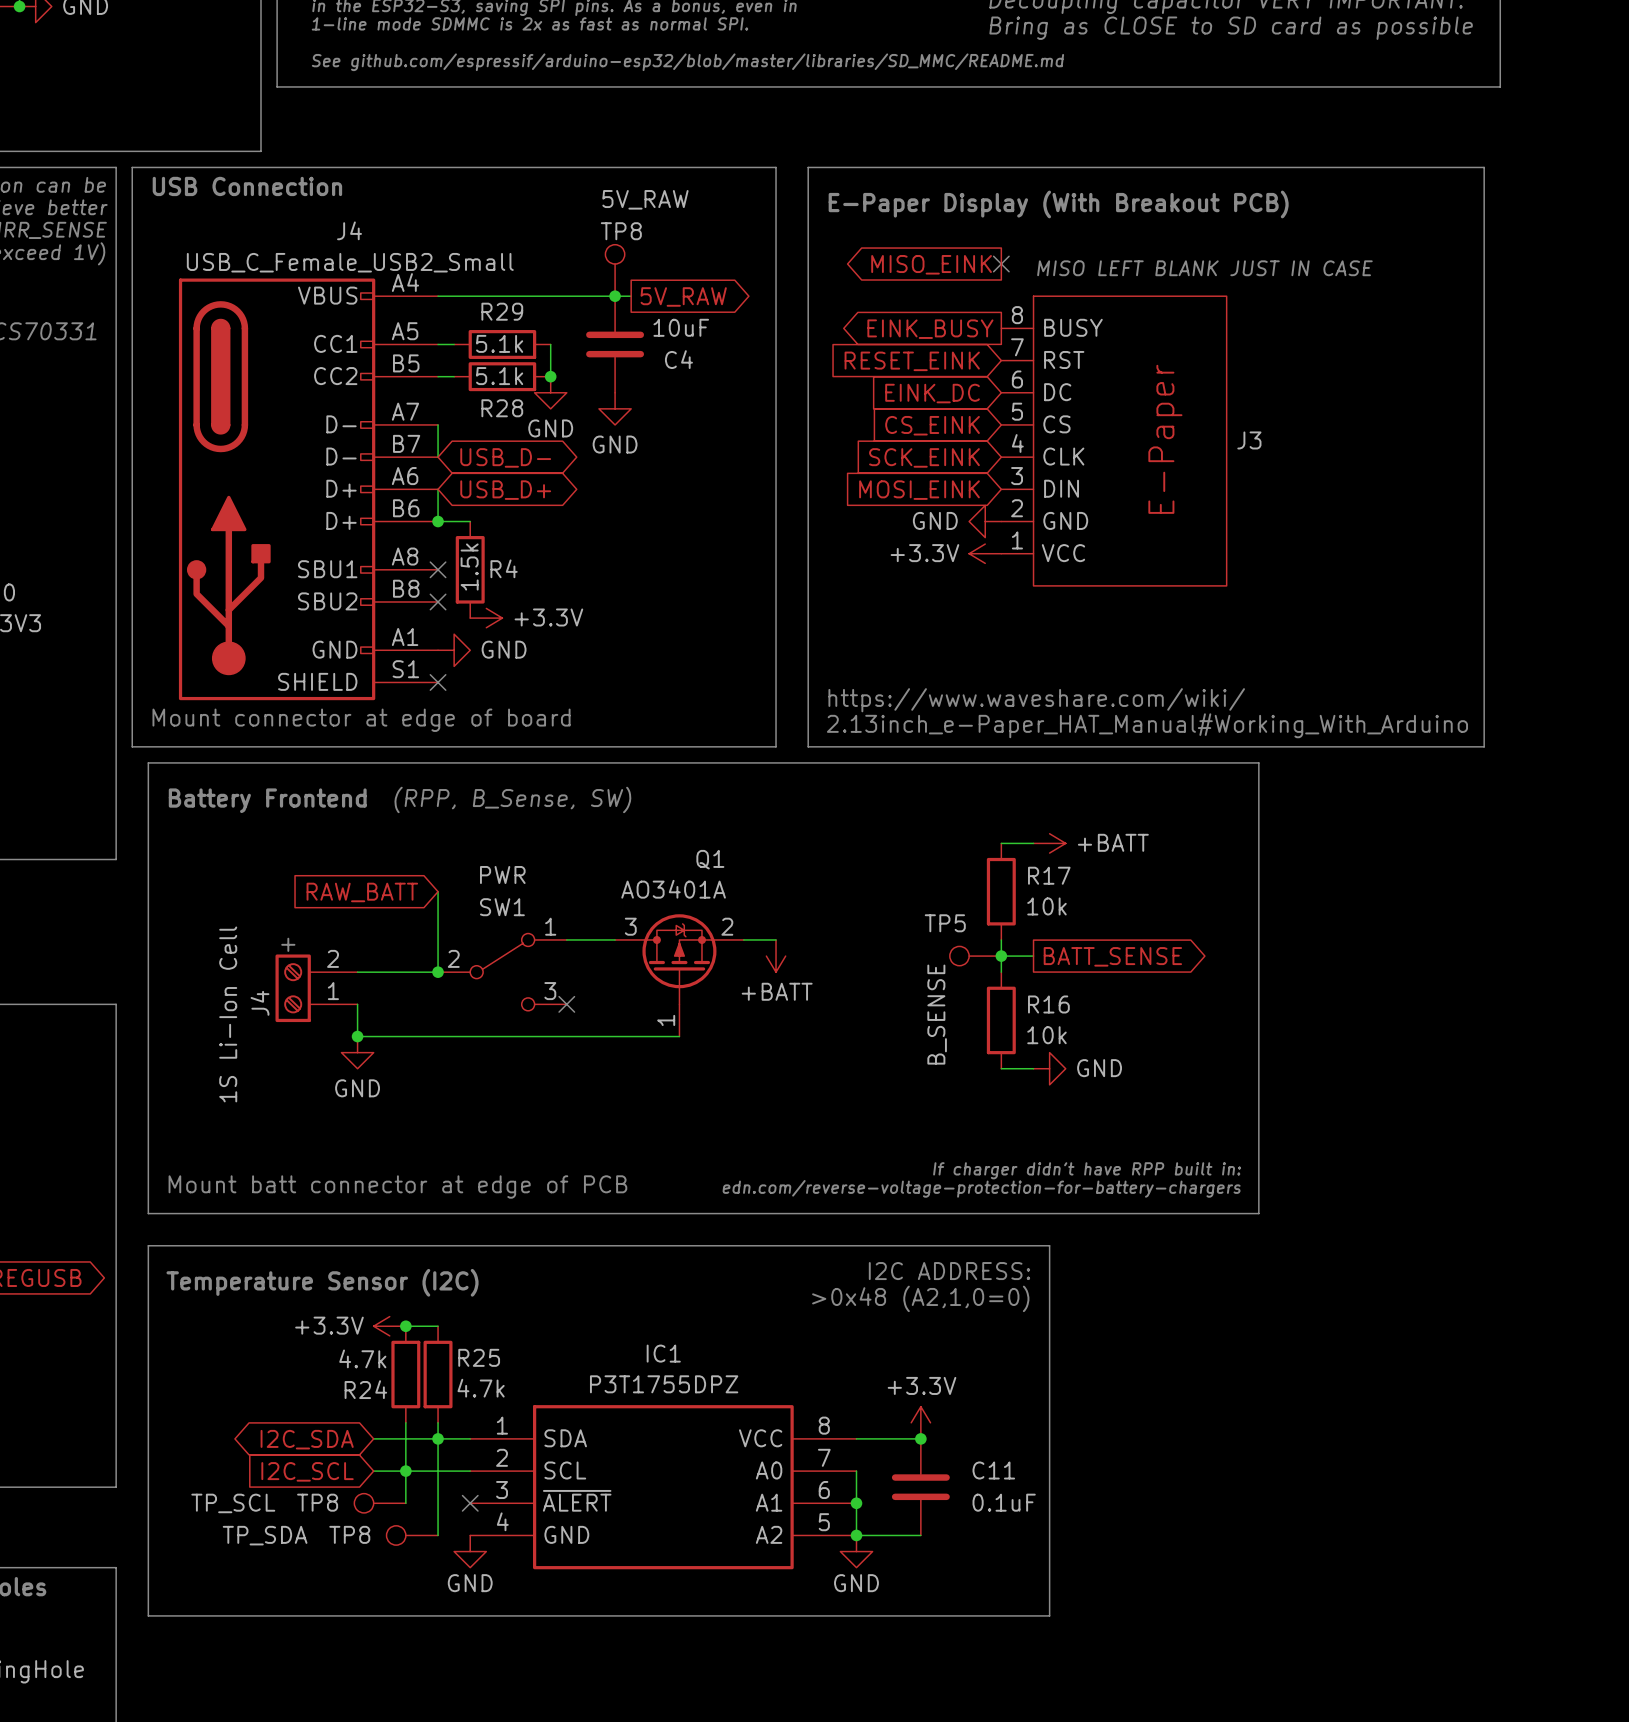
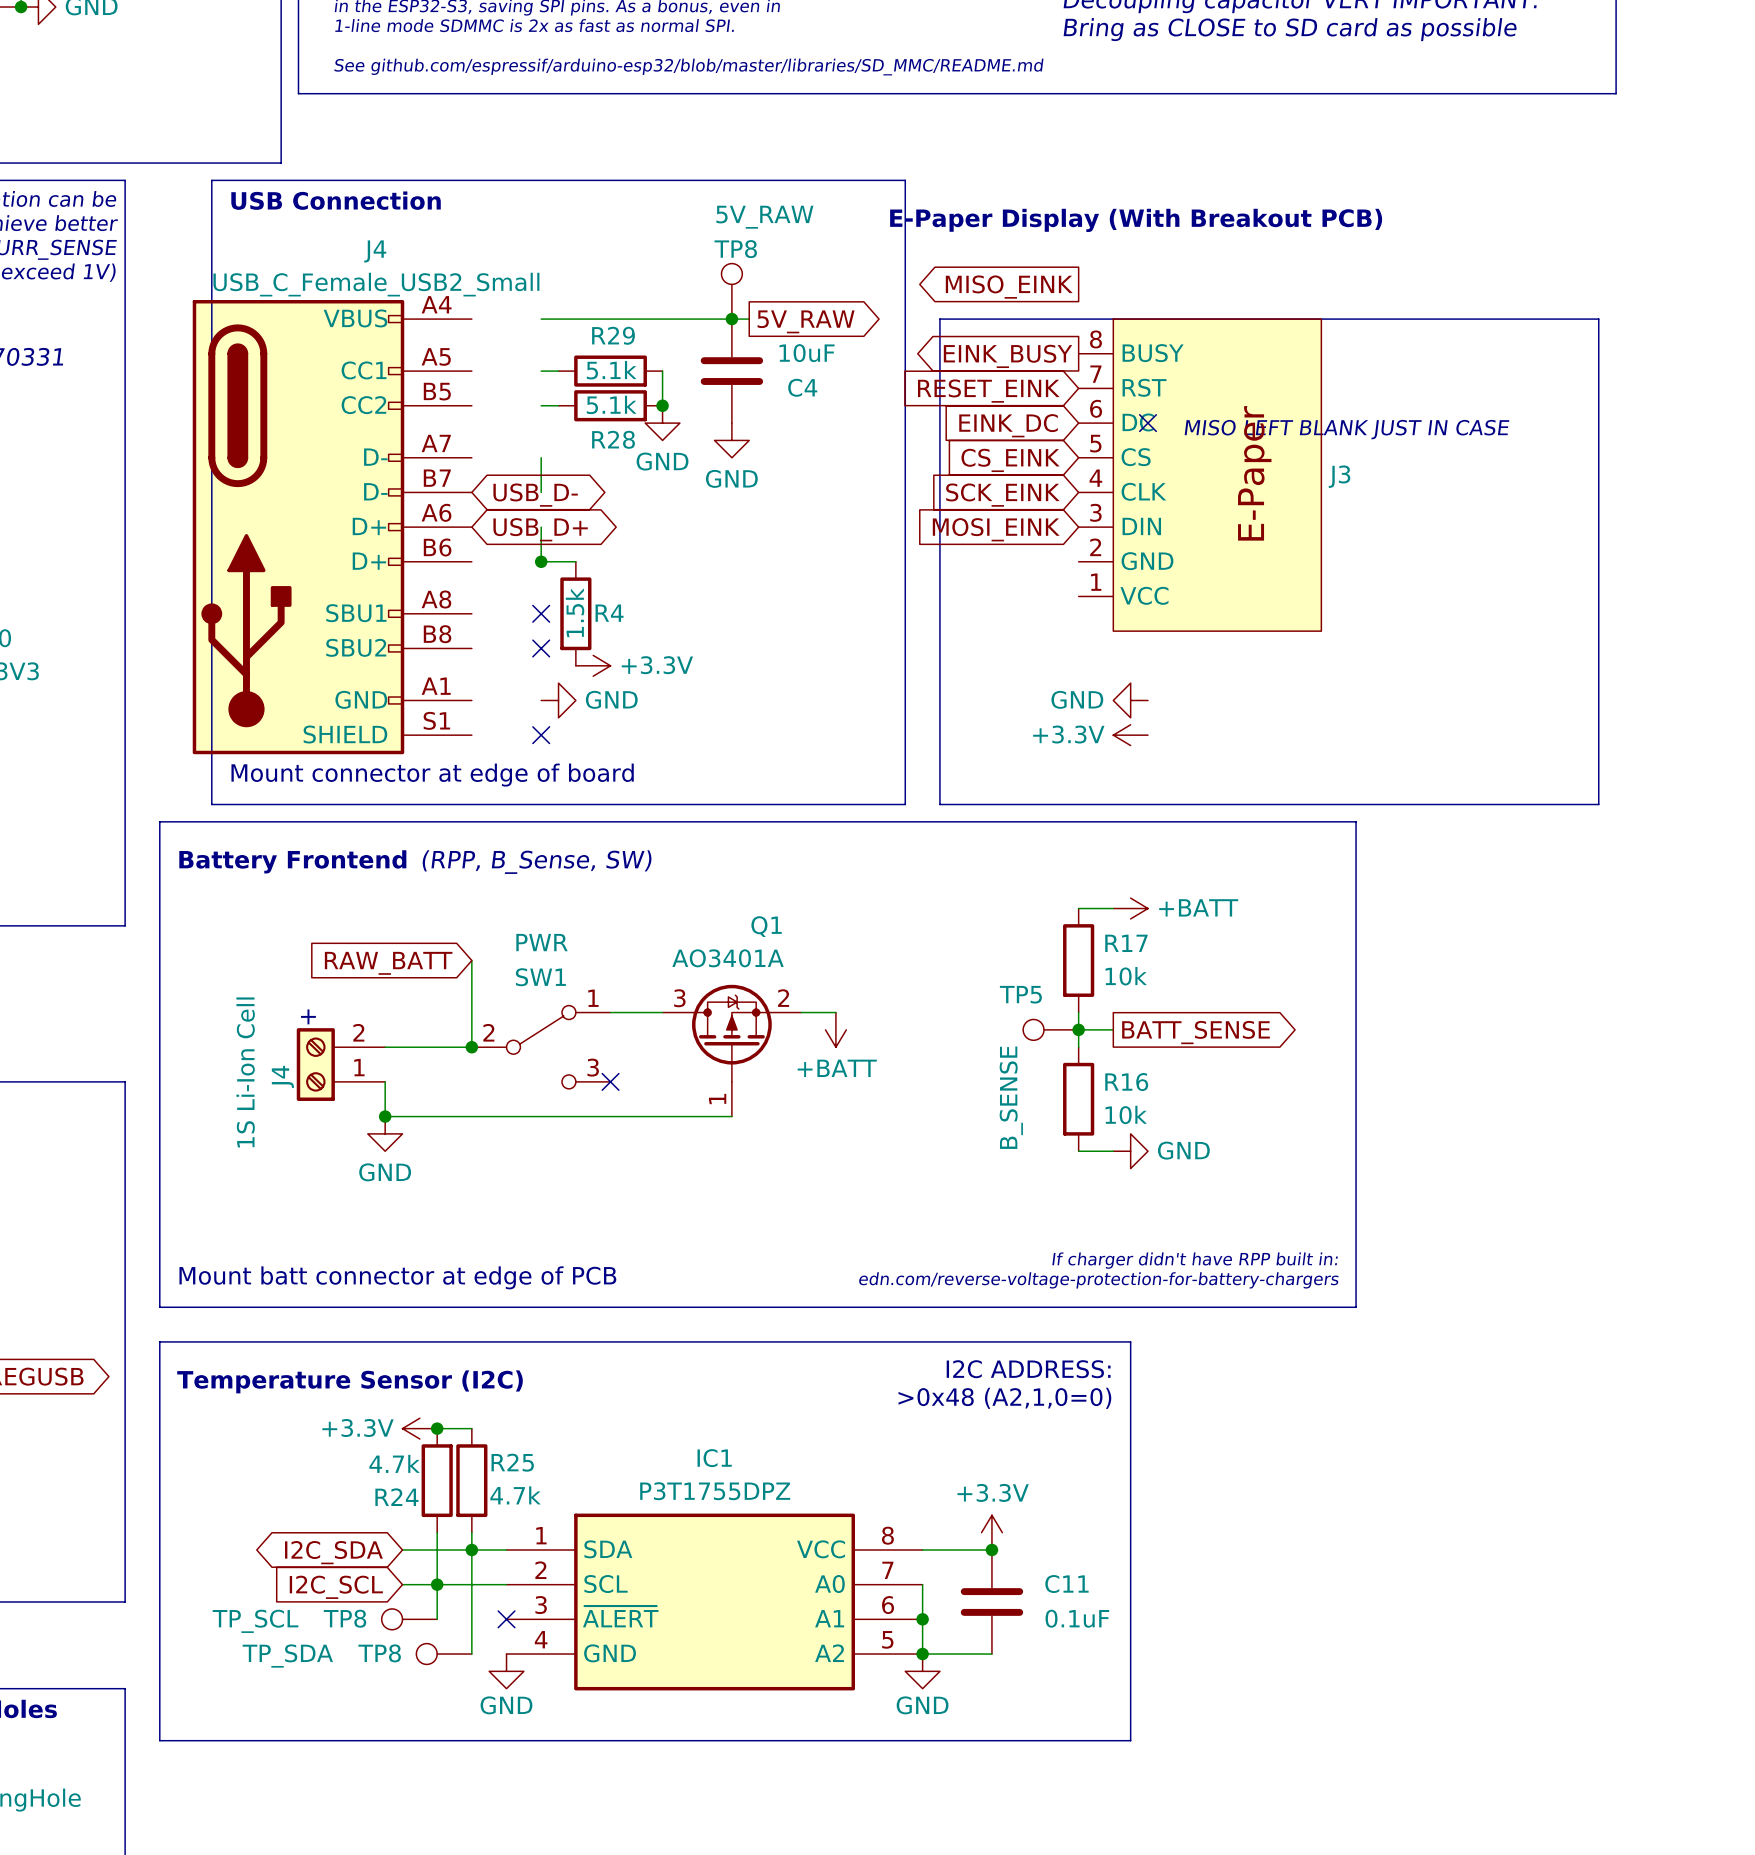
line: (196, 167) (132, 167) (132, 746) (196, 746) -> (211, 180) (211, 804)
line: (776, 167) (776, 746) -> (835, 180) (870, 180)
line: (808, 167) (808, 746) -> (835, 804) (870, 804)
line: (840, 167) (1484, 167) (1484, 296) -> (939, 804) (939, 319) (1598, 319)
text position: USB Connection (247, 186) -> USB Connection (336, 200)
no-connect mark: (1001, 264) -> none
text position: MISO LEFT BLANK JUST IN CASE (1204, 268) -> MISO LEFT BLANK JUST IN CASE (1346, 429)
TP8 position: (615, 270) -> (731, 291)
wire: (438, 296) (502, 296) -> (679, 319) (749, 319)
junction: (615, 296) -> none
junction: none -> (731, 319)
global label position: 5V_RAW (683, 296) -> 5V_RAW (806, 321)
wire: (438, 344) (454, 344) -> (541, 371) (558, 371)
R29 position: (502, 344) -> (610, 371)
C4 position: (615, 344) -> (731, 371)
wire: (438, 376) (454, 376) -> (541, 405) (558, 405)
R28 position: (502, 376) -> (610, 405)
junction: (550, 376) -> none
junction: none -> (662, 405)
power symbol: GND (550, 392) -> none
no-connect mark: none -> (1147, 423)
power symbol position: GND (615, 408) -> GND (662, 423)
power symbol: none -> GND (731, 440)
wire: (438, 424) (438, 457) -> (541, 457) (541, 492)
wire: (438, 489) (438, 521) (470, 521) -> (541, 527) (541, 561) (575, 561)
junction position: (438, 521) -> (541, 561)
power symbol position: GND (985, 521) -> GND (1130, 700)
power symbol position: +3.3V (985, 553) -> +3.3V (1130, 735)
no-connect mark: (438, 569) -> none
R4 position: (470, 569) -> (575, 613)
no-connect mark: none -> (541, 613)
no-connect mark: (438, 602) -> none
no-connect mark: none -> (541, 648)
power symbol position: +3.3V (486, 618) -> +3.3V (593, 665)
power symbol position: GND (454, 650) -> GND (558, 700)
no-connect mark: (438, 682) -> none
no-connect mark: none -> (541, 735)
text: https://www.waveshare.com/wiki/ (1036, 700) -> none
text position: Mount connector at edge of board (361, 720) -> Mount connector at edge of board (432, 775)
text: 2.13inch_e-Paper_HAT_Manual#Working_With_Arduino (1147, 725) -> none
line: (840, 746) (872, 746) -> (905, 804) (905, 180)

